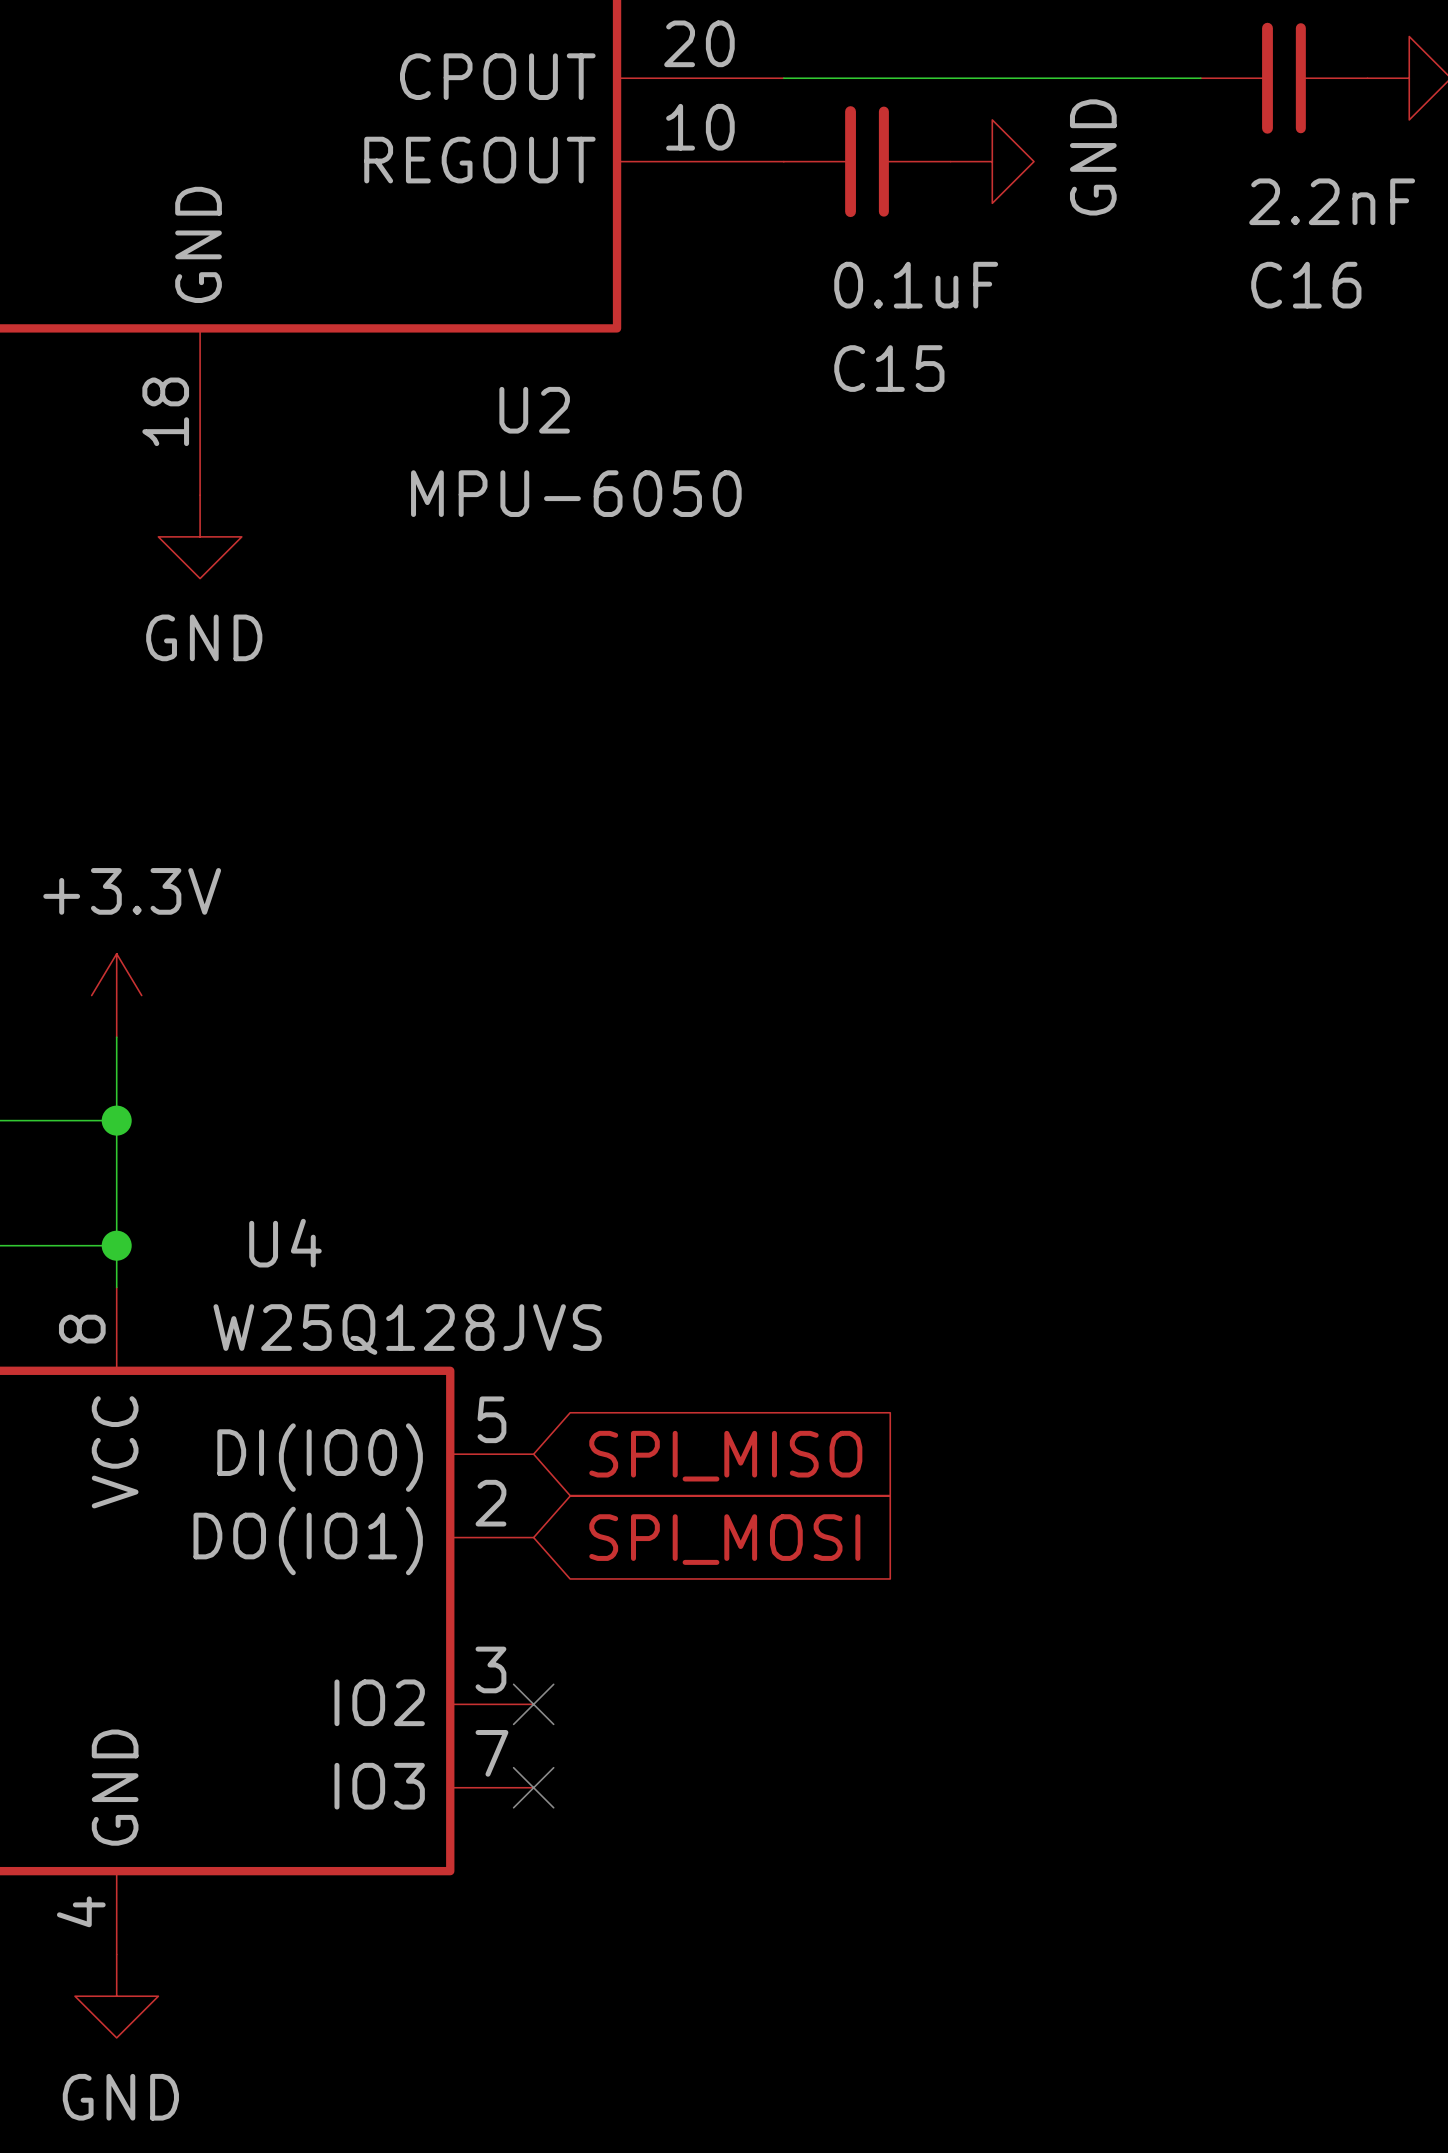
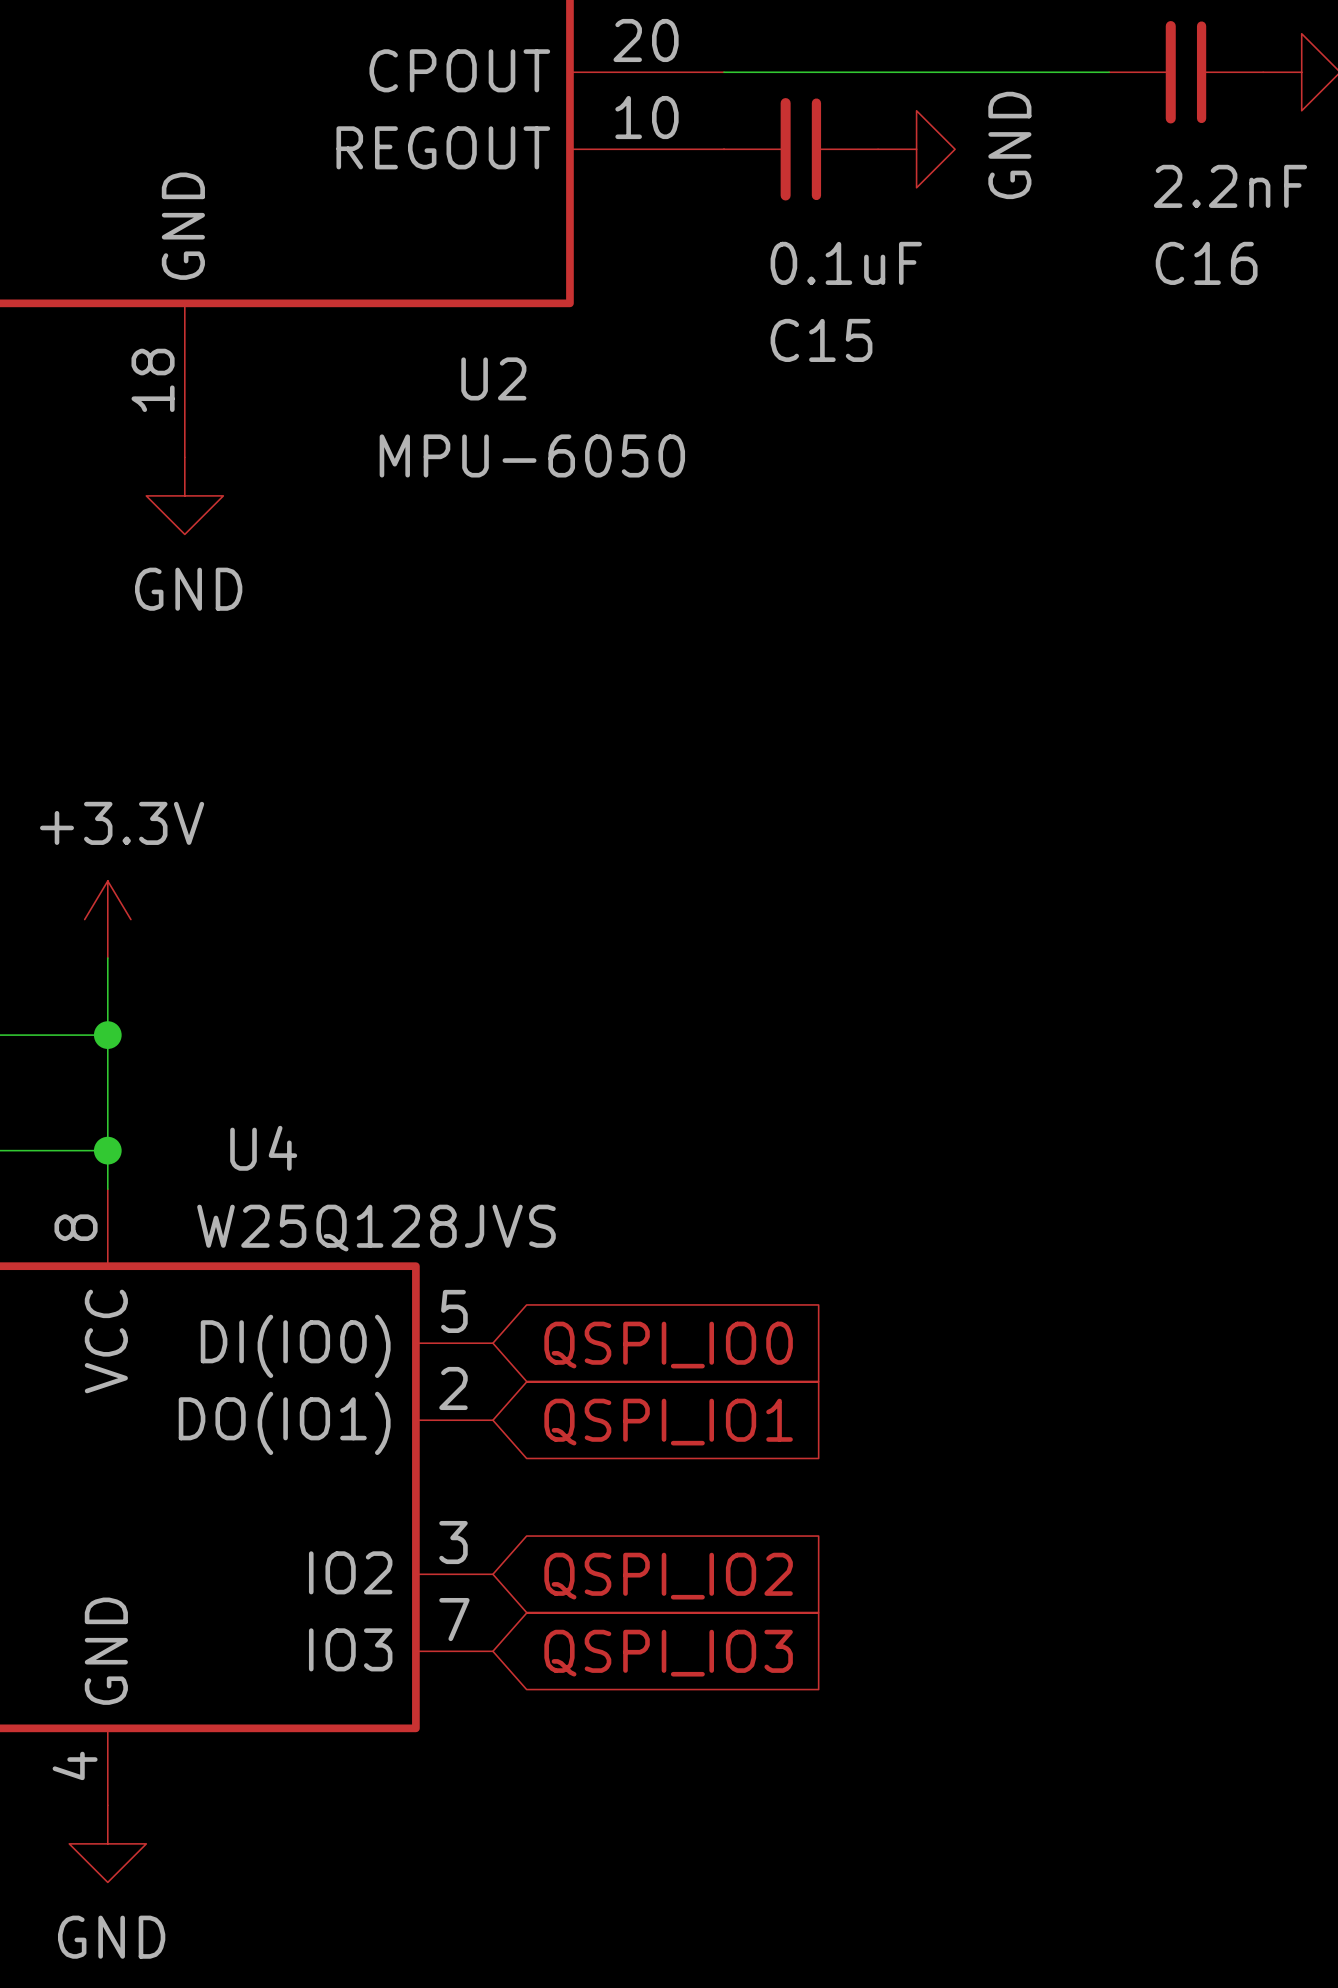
global label: SPI_MISO (725, 1456) -> QSPI_IO0 (668, 1345)
global label: SPI_MOSI (724, 1539) -> QSPI_IO1 (668, 1422)
no-connect mark: (533, 1704) -> none
global label: none -> QSPI_IO2 (668, 1576)
no-connect mark: (533, 1787) -> none
global label: none -> QSPI_IO3 (668, 1653)

